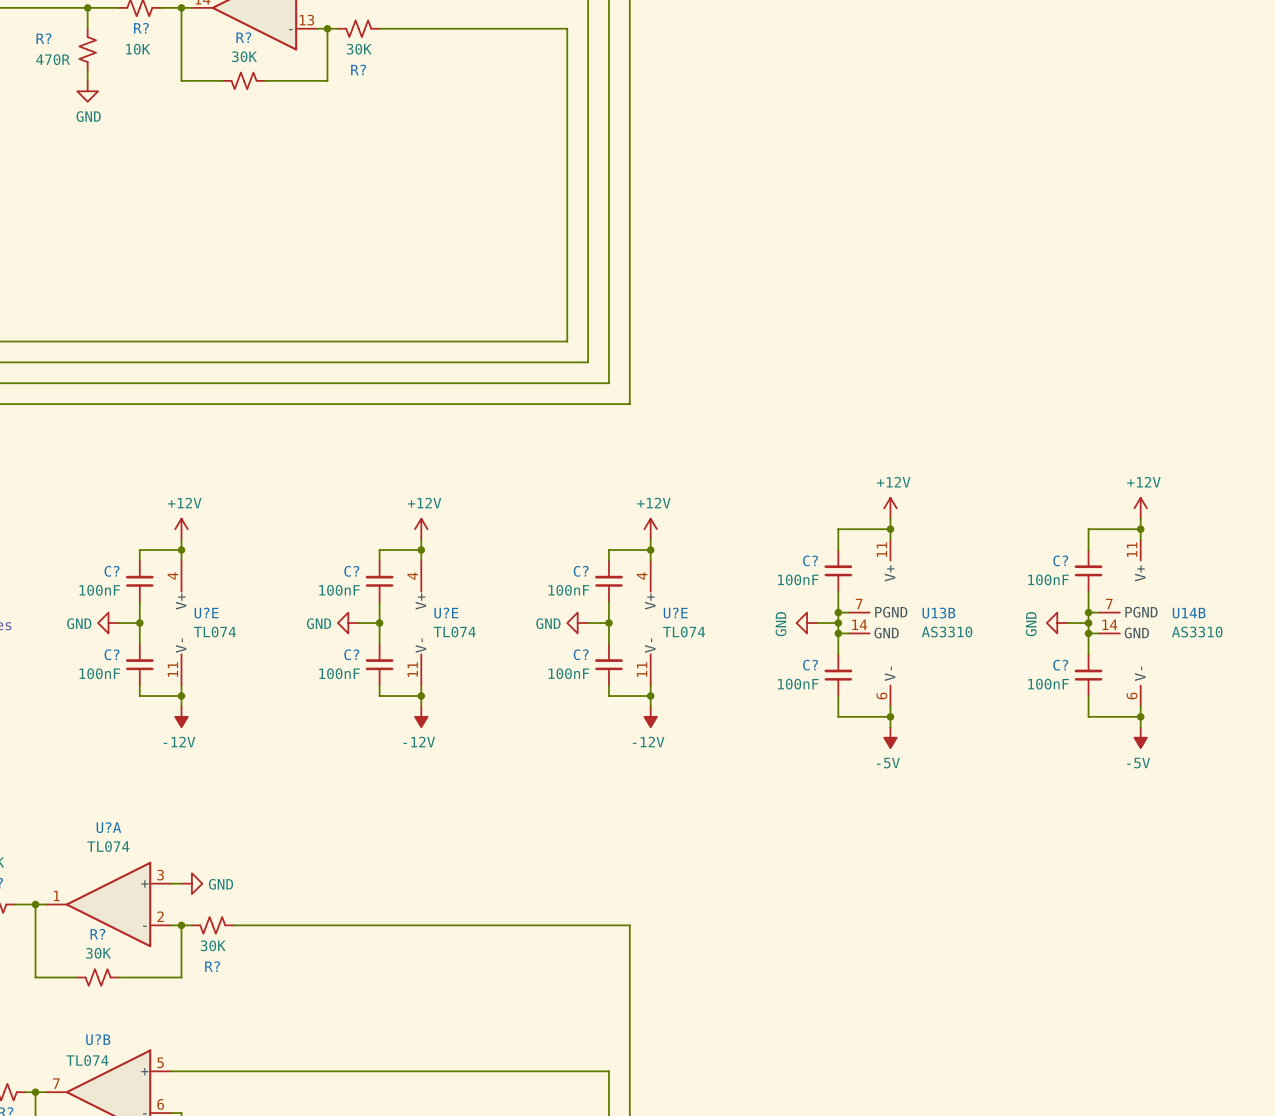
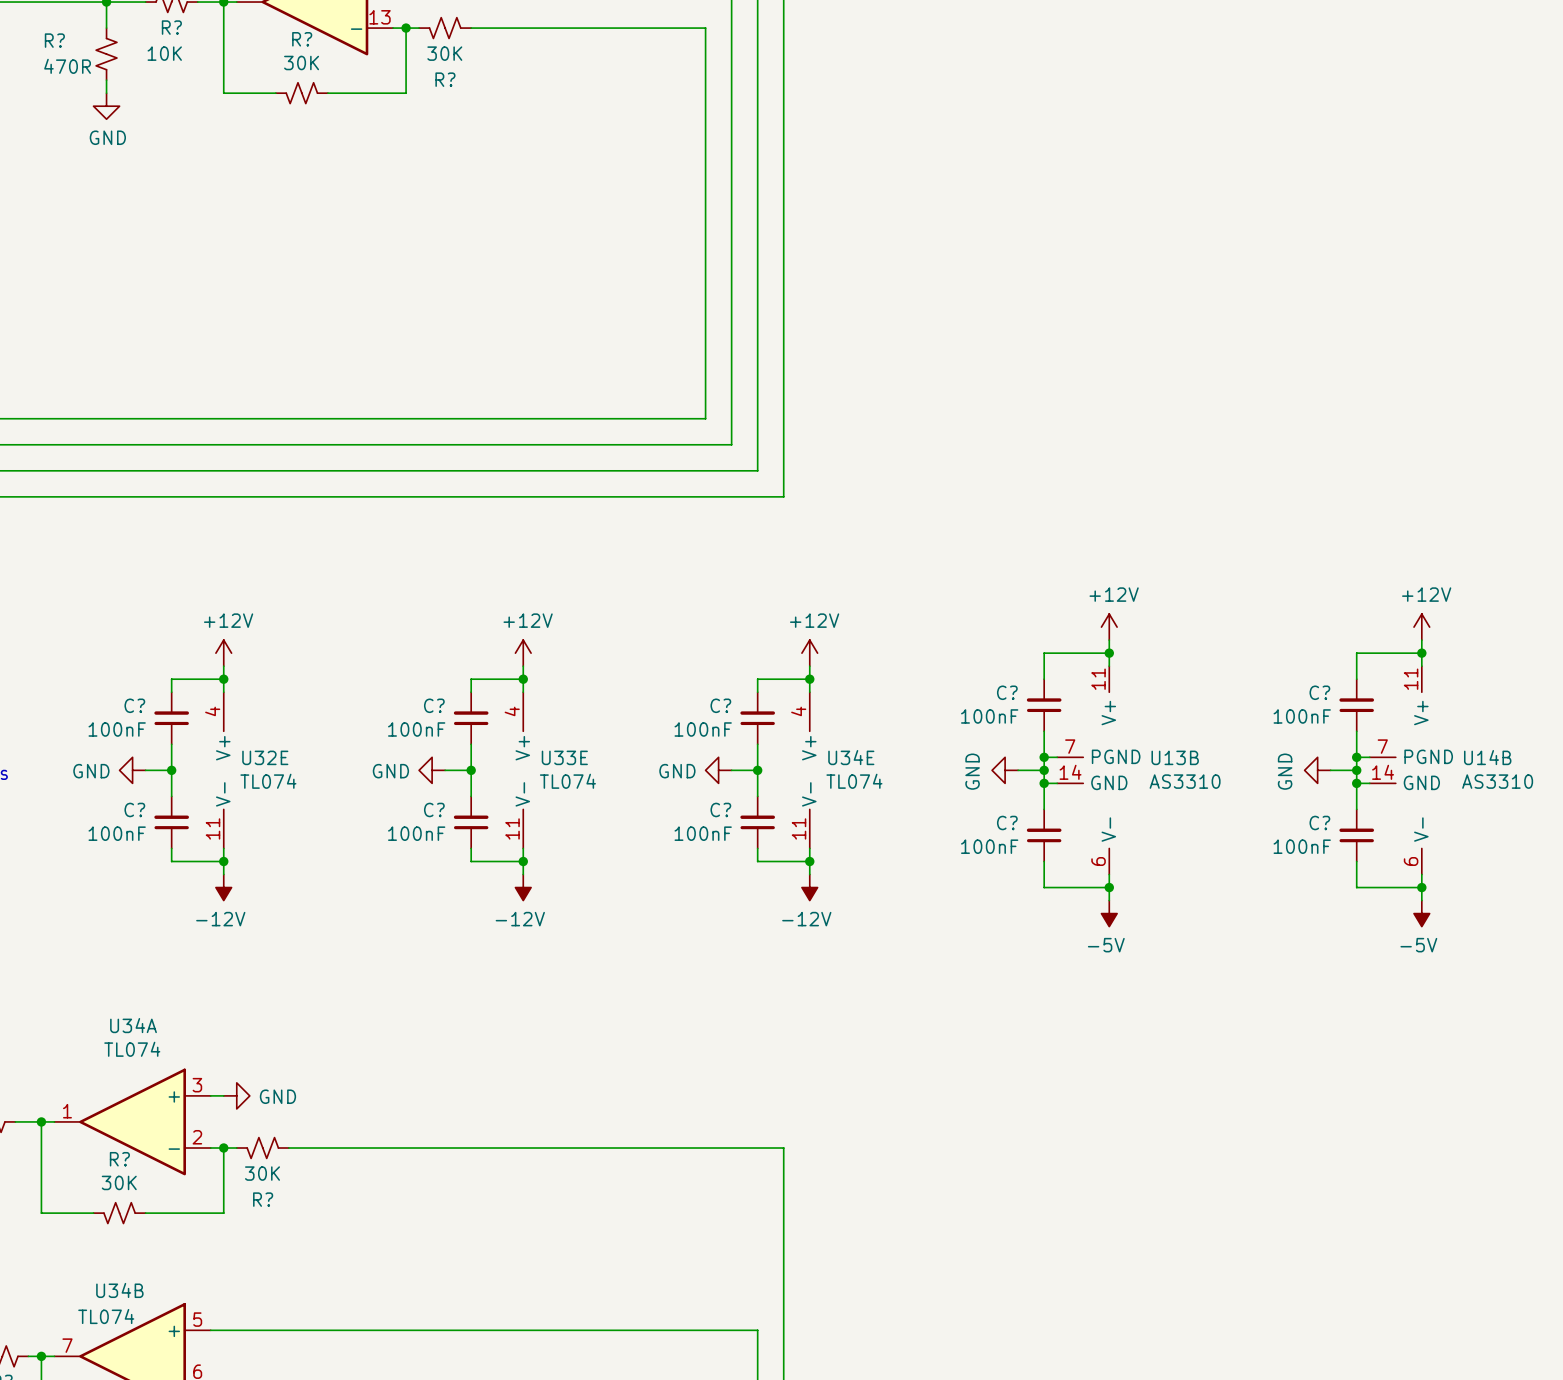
U?E name: U?E (206, 613) -> U32E (265, 757)
U?E name: U?E (446, 613) -> U33E (564, 757)
U?E name: U?E (675, 613) -> U34E (851, 757)
U?A name: U?A (108, 827) -> U34A (133, 1025)
U?B name: U?B (98, 1039) -> U34B (119, 1290)

